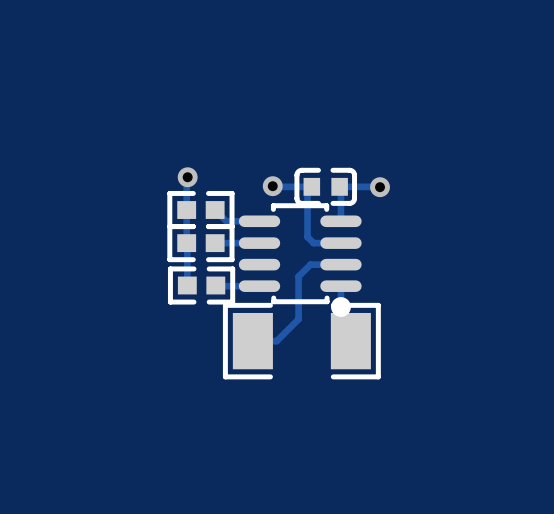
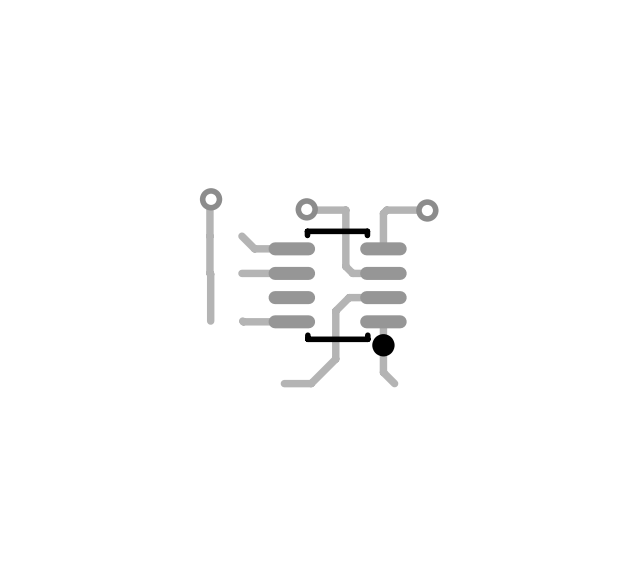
part: (325, 186) -> none
part: (200, 210) -> none
part: (200, 243) -> none
part: (201, 285) -> none
part: (301, 341) -> none

